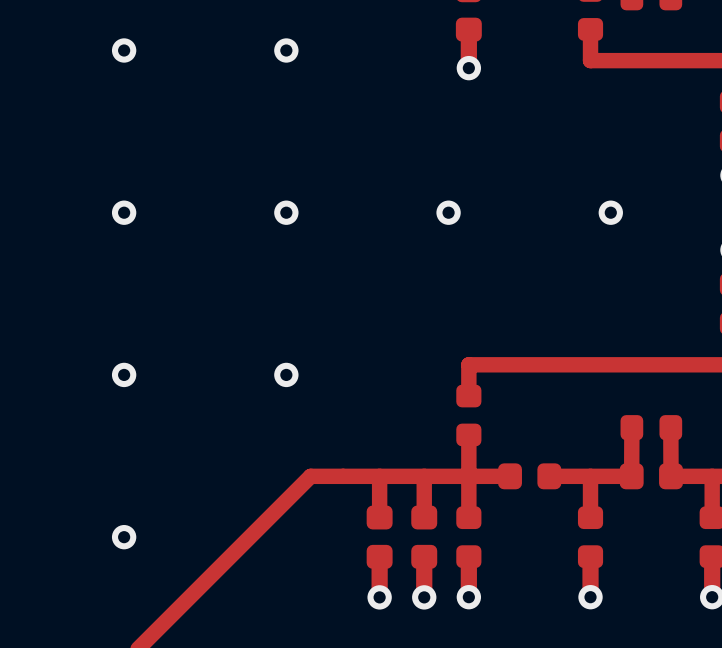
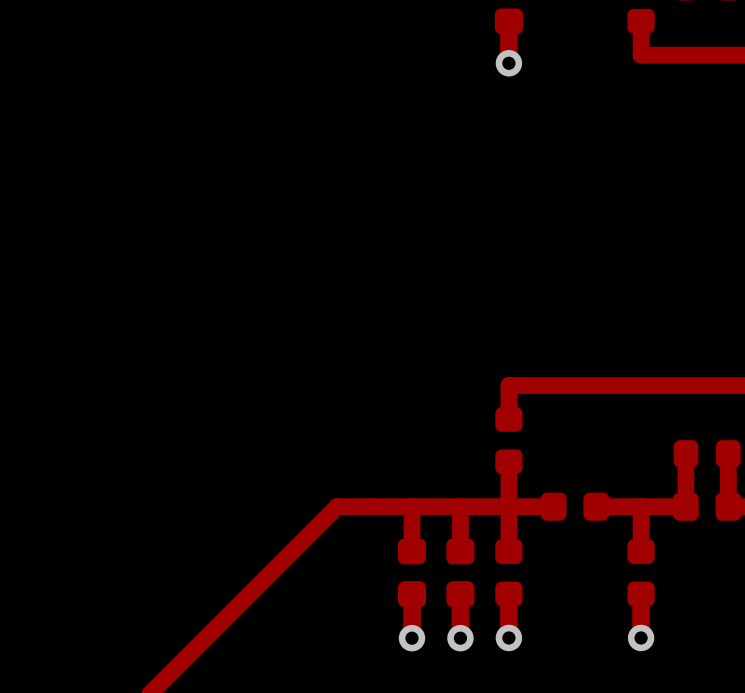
via: (124, 50) -> none
via: (286, 50) -> none
via: (124, 212) -> none
via: (286, 212) -> none
via: (448, 212) -> none
via: (610, 212) -> none
via: (124, 374) -> none
via: (286, 374) -> none
via: (124, 537) -> none

